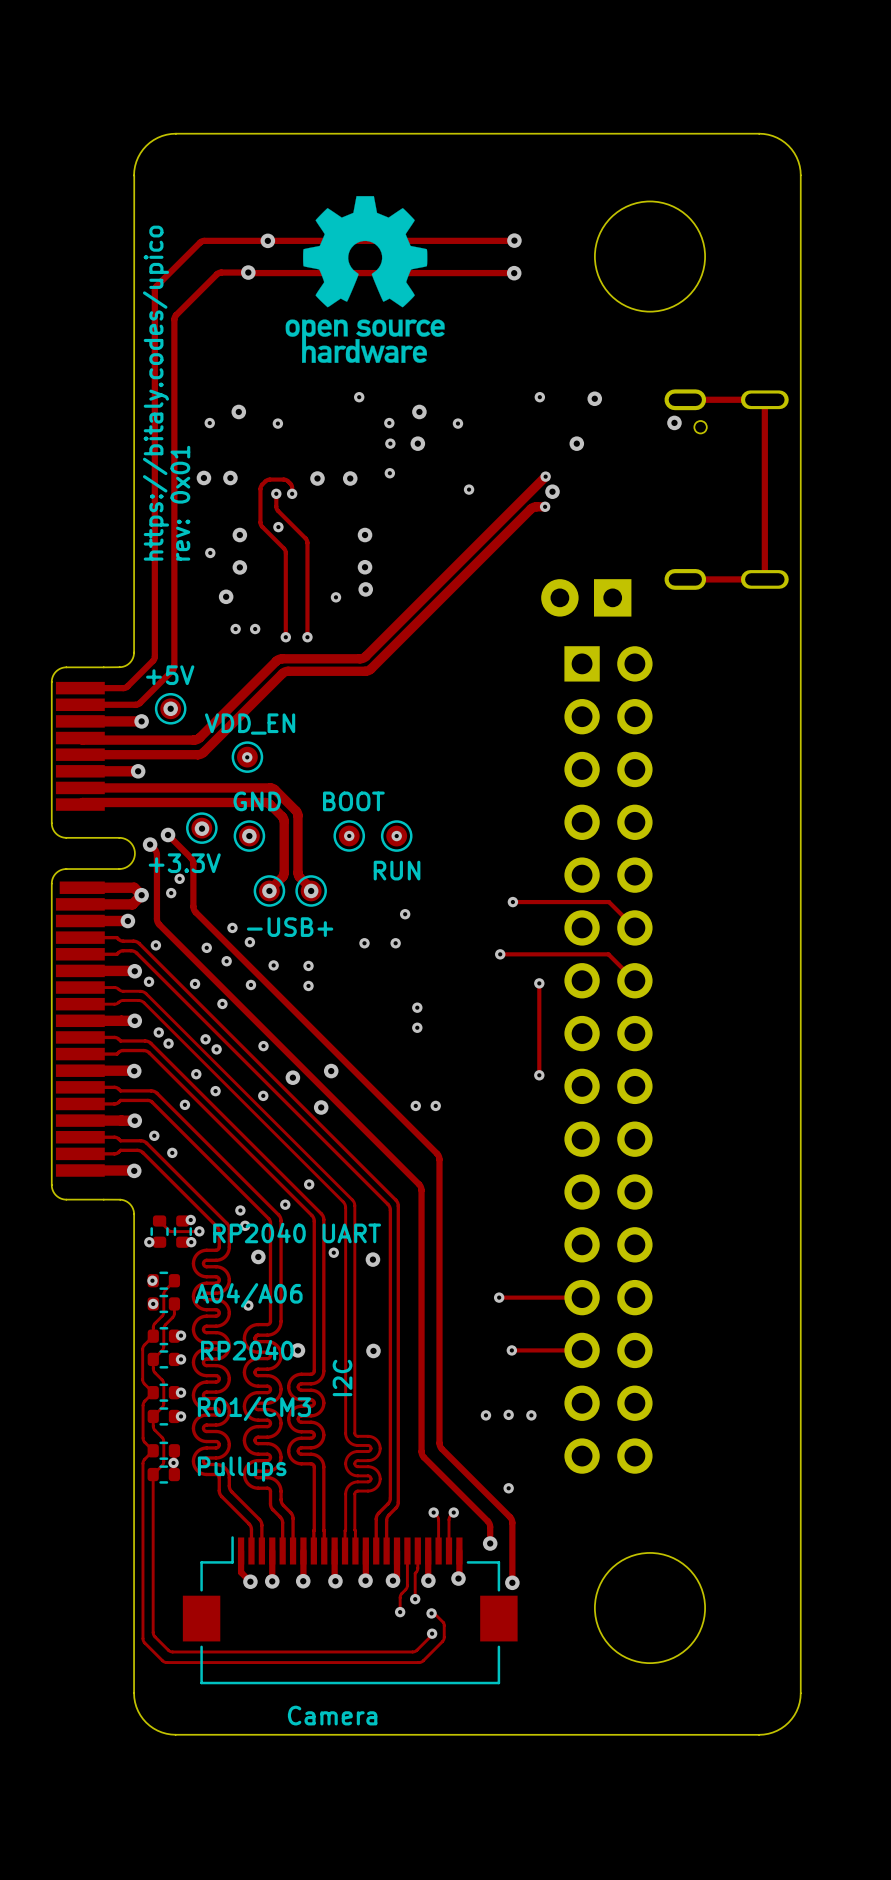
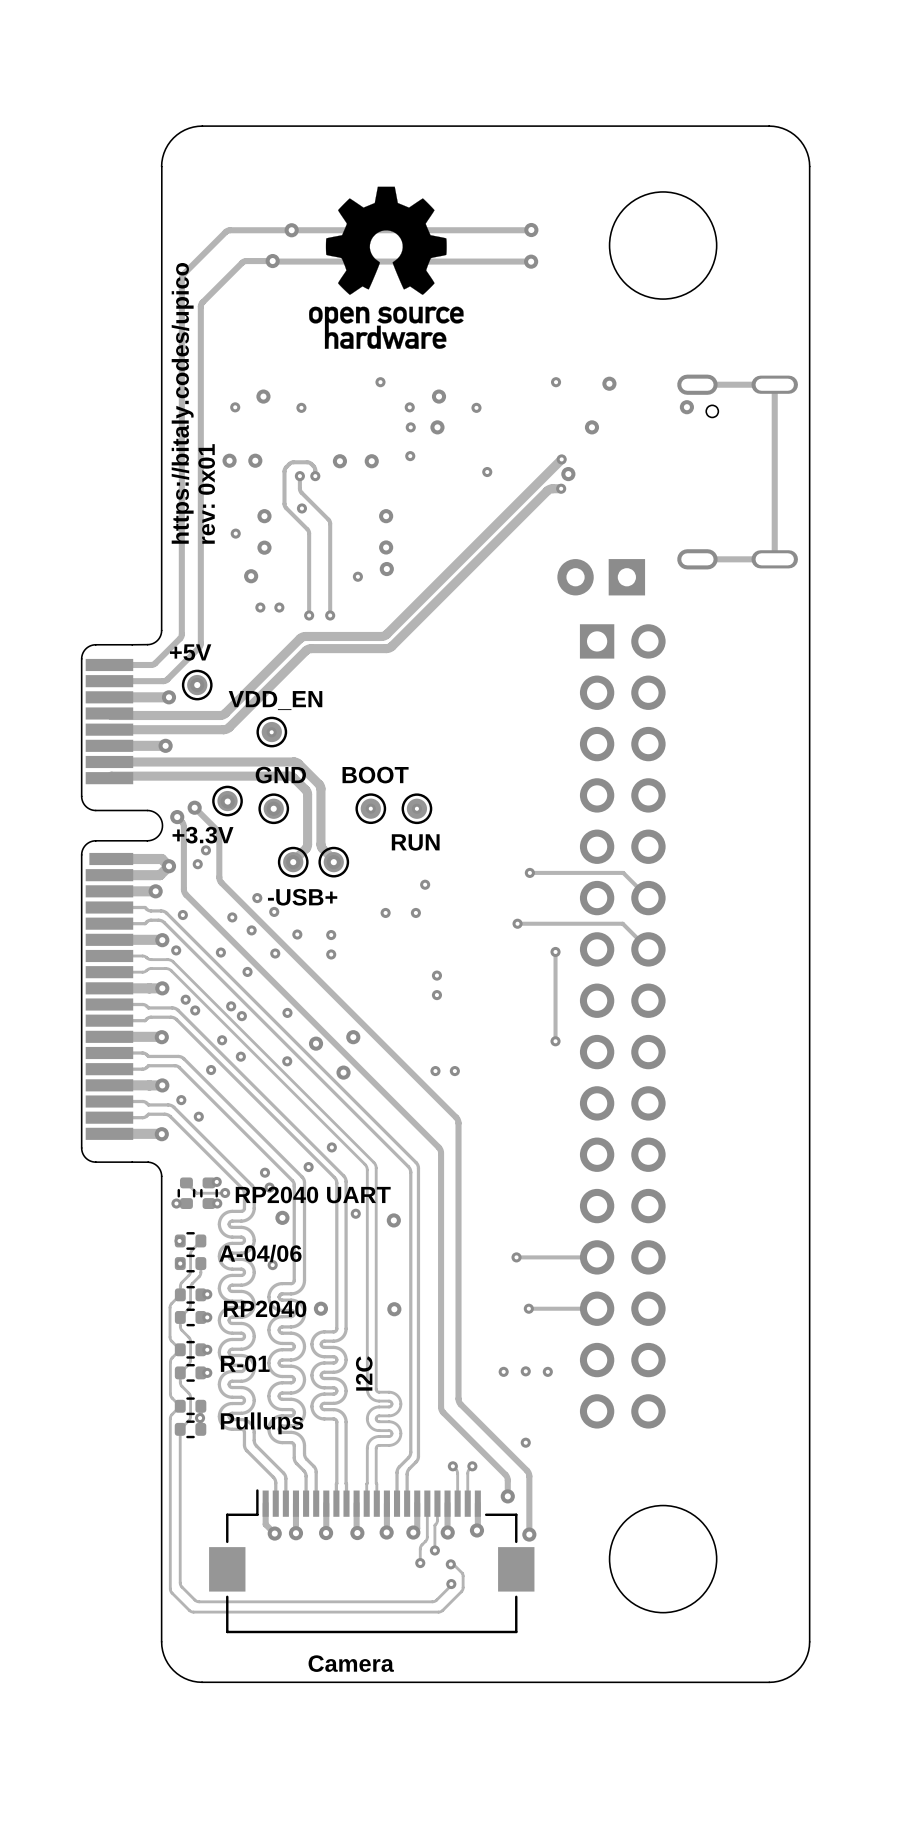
text: A04/A06 (248, 1295) -> A-04/06 (260, 1253)
text: R01/CM3 (254, 1408) -> R-01 (245, 1363)

